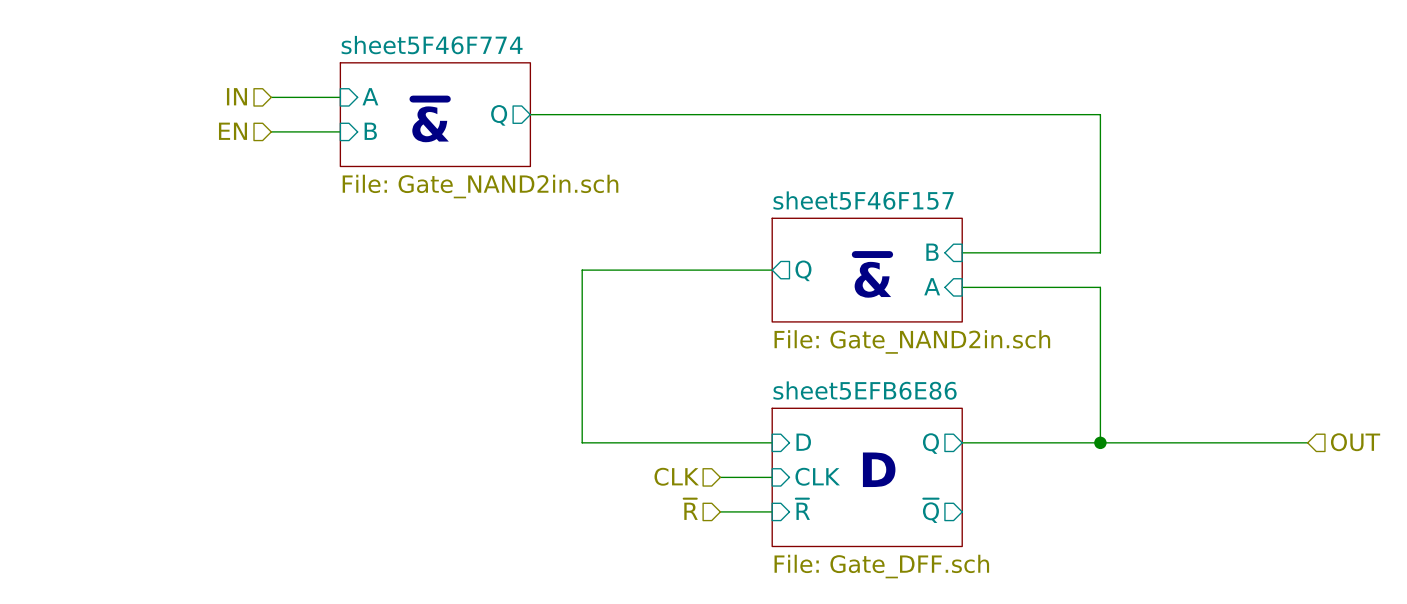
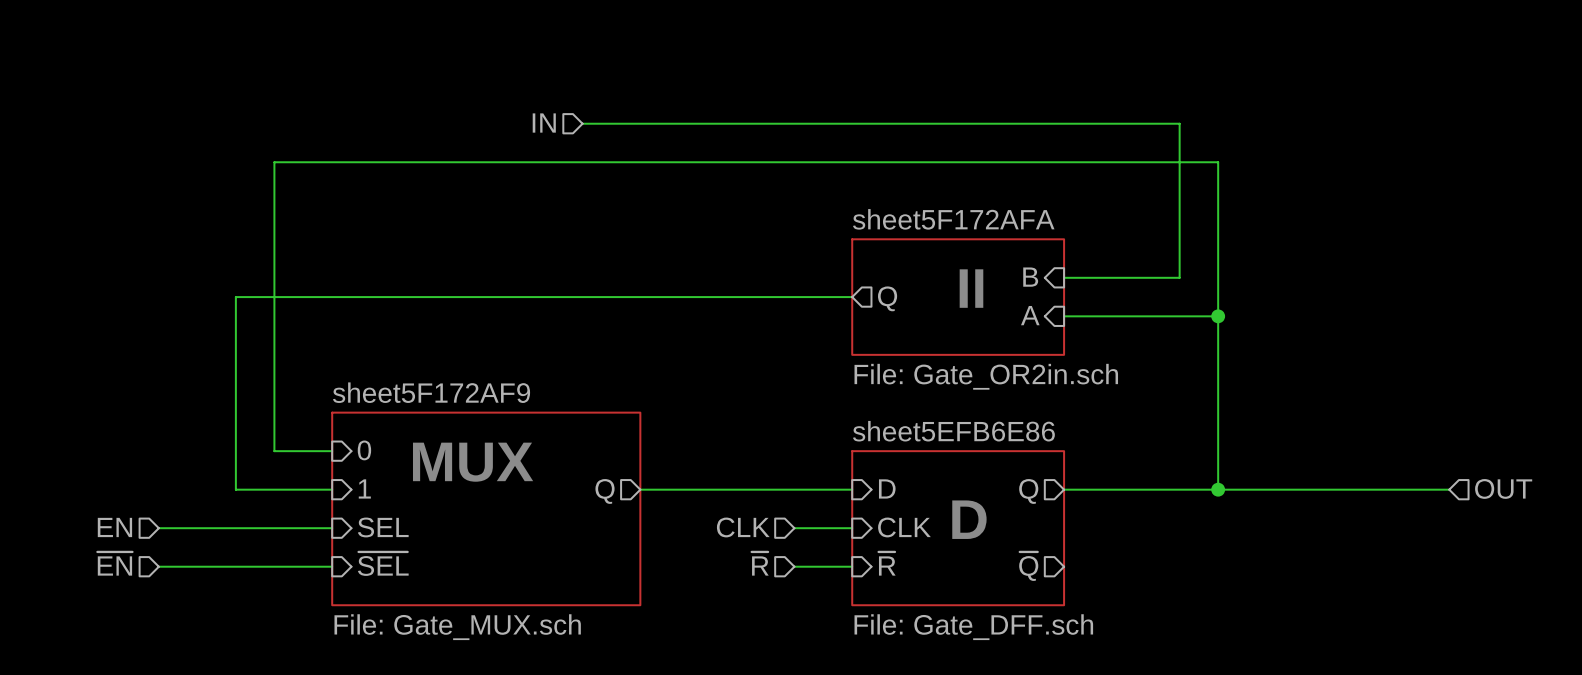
hierarchical label position: IN (236, 96) -> IN (544, 123)
sheet pin: A (370, 96) -> none
wire: (271, 97) (340, 97) -> none
sheet sheet5F46F774: File: Gate_NAND2in.sch (435, 114) -> none
wire: (1065, 114) (1100, 114) (1100, 149) -> (1179, 123) (1179, 277)
sheet pin position: Q (499, 115) -> Q (605, 491)
text: ~{&} (430, 120) -> none
hierarchical label: EN (232, 131) -> none
wire: (271, 131) (340, 131) -> none
sheet pin: B (370, 131) -> none
wire: none -> (1218, 162) (274, 162) (274, 451) (332, 451)
sheet sheet5F46F157 name: sheet5F46F157 (863, 200) -> sheet5F172AFA (953, 219)
wire: (1065, 252) (1100, 252) -> (1218, 316) (1218, 277)
text: none -> II (971, 288)
wire: (582, 270) (582, 442) -> (640, 297) (235, 297) (235, 489) (332, 489)
text: ~{&} (872, 276) -> none
junction: none -> (1218, 316)
sheet sheet5F46F157 value: File: Gate_NAND2in.sch (912, 341) -> File: Gate_OR2in.sch (986, 376)
sheet pin: none -> 0 (364, 450)
text: none -> MUX (473, 462)
sheet pin: none -> 1 (364, 488)
sheet sheet5F172AF9: none -> File: Gate_MUX.sch (486, 508)
hierarchical label: none -> EN (114, 527)
sheet pin: none -> SEL (383, 527)
wire: none -> (158, 528) (332, 528)
hierarchical label: none -> ~{EN} (114, 563)
sheet pin: none -> ~{SEL} (383, 563)
wire: none -> (158, 566) (332, 566)

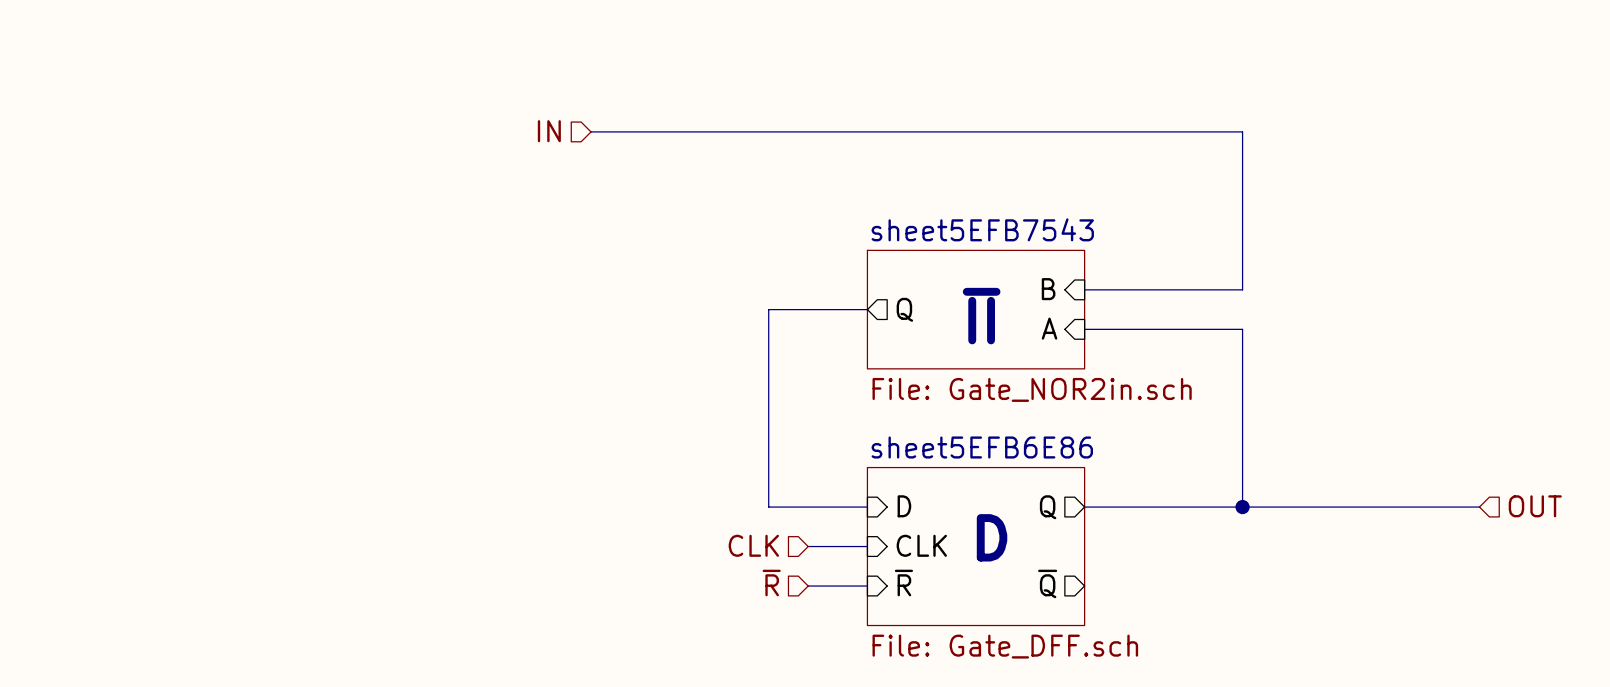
wire: (1179, 123) (1179, 277) -> (1203, 131) (1242, 131) (1242, 171)
wire: (1218, 162) (274, 162) (274, 451) (332, 451) -> none
sheet sheet5F172AFA name: sheet5F172AFA (953, 219) -> sheet5EFB7543 (982, 229)
wire: (1218, 277) (1218, 316) -> (1242, 289) (1203, 289)
text: II (971, 288) -> none
wire: (755, 297) (235, 297) (235, 489) (332, 489) -> none
text: none -> ~{II} (981, 316)
junction: (1218, 316) -> none
sheet sheet5F172AFA value: File: Gate_OR2in.sch (986, 376) -> File: Gate_NOR2in.sch (1032, 389)
sheet pin: 0 (364, 450) -> none
text: MUX (473, 462) -> none
sheet pin: 1 (364, 488) -> none
wire: (640, 489) (755, 489) -> (768, 309) (768, 507)
sheet pin: Q (605, 491) -> none
sheet sheet5F172AF9: File: Gate_MUX.sch (486, 508) -> none
hierarchical label: EN (114, 527) -> none
sheet pin: SEL (383, 527) -> none
wire: (158, 528) (332, 528) -> none
hierarchical label: ~{EN} (114, 563) -> none
sheet pin: ~{SEL} (383, 563) -> none
wire: (158, 566) (332, 566) -> none

